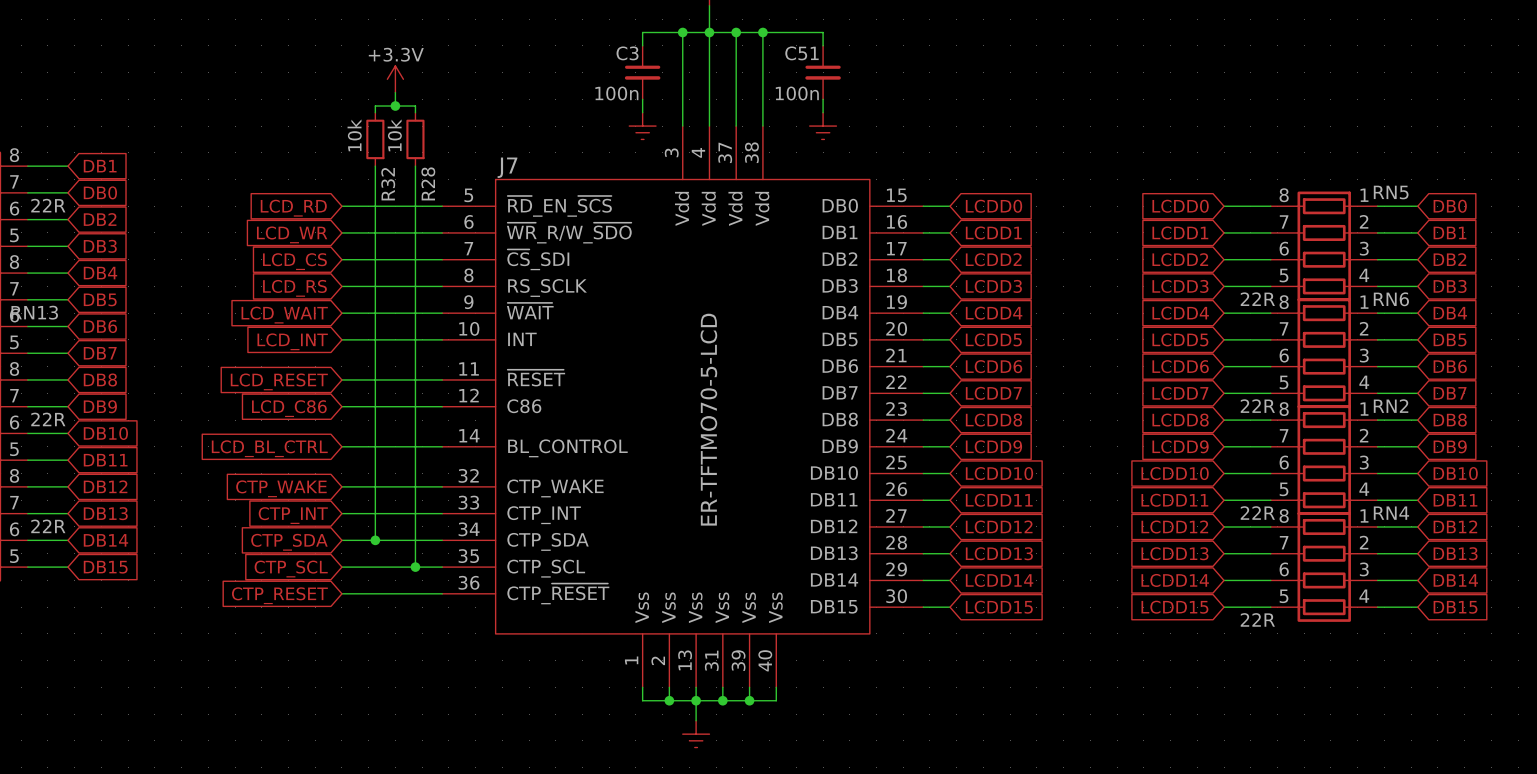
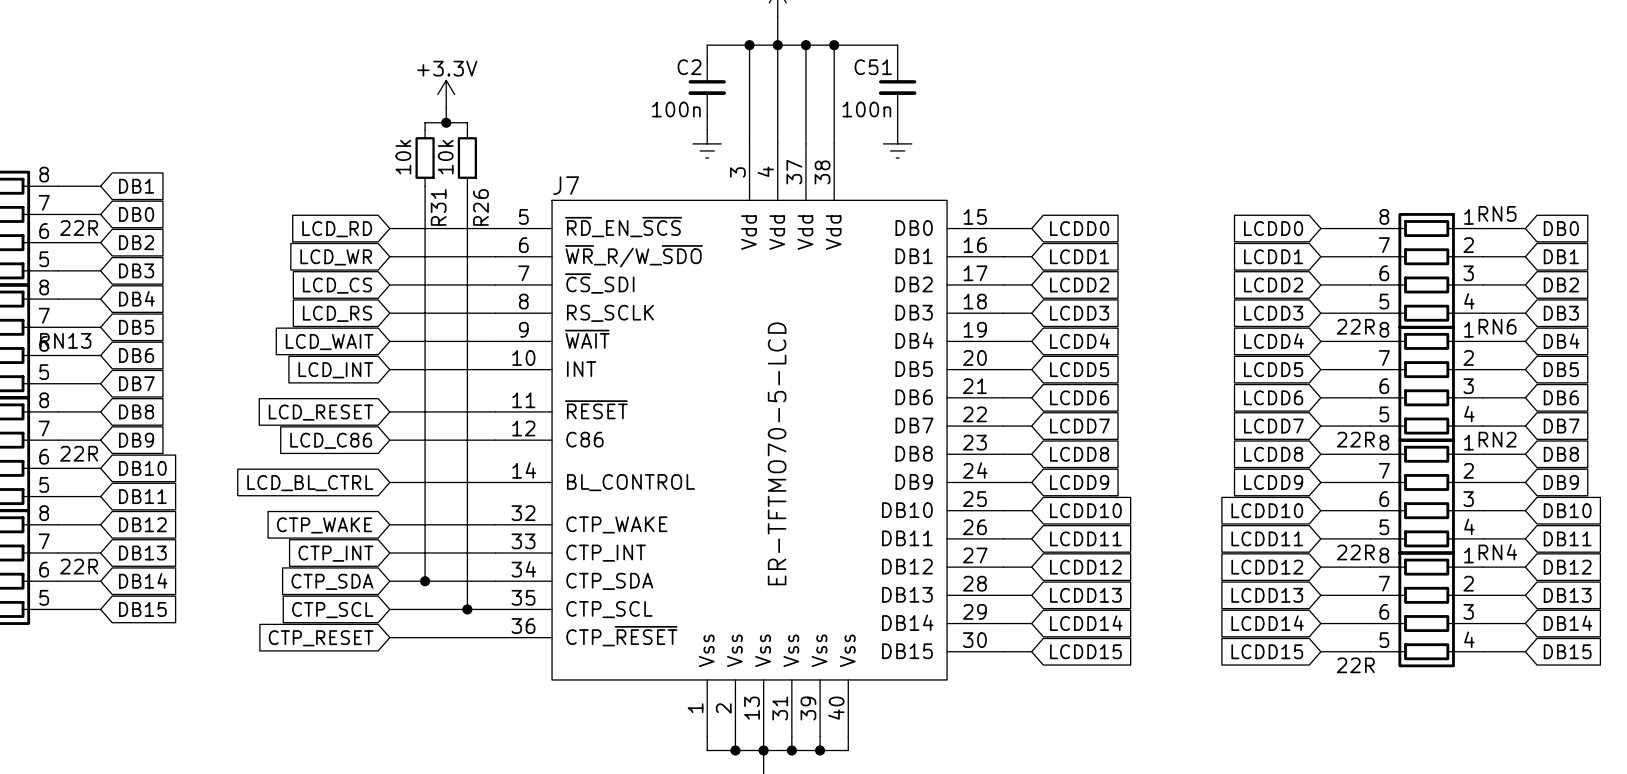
C3 name: C3 (627, 53) -> C2 (689, 67)
R28 name: R28 (428, 183) -> R26 (480, 207)
R32 name: R32 (388, 184) -> R31 (438, 207)

